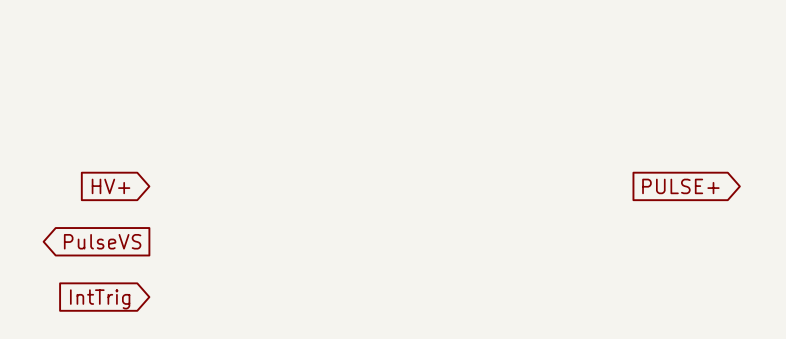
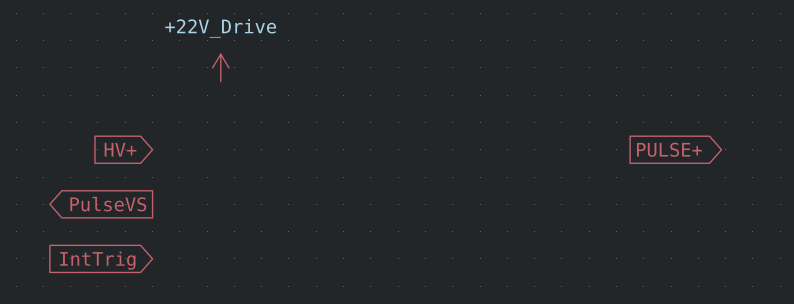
power symbol: none -> +22V_Drive (220, 67)

